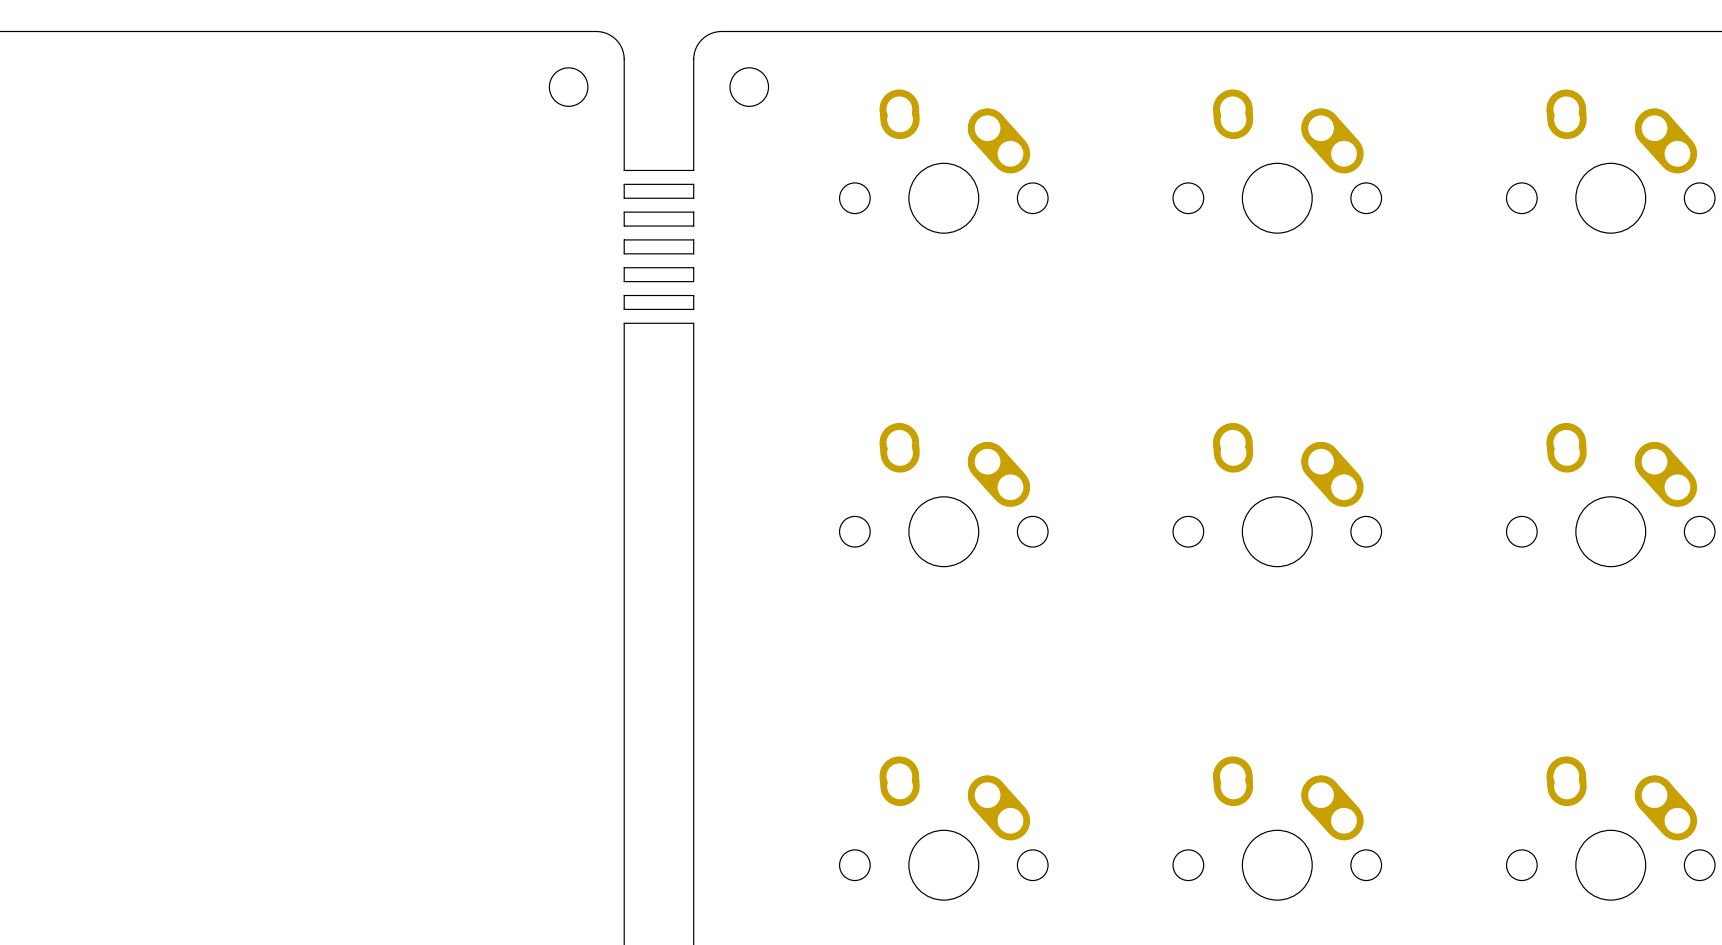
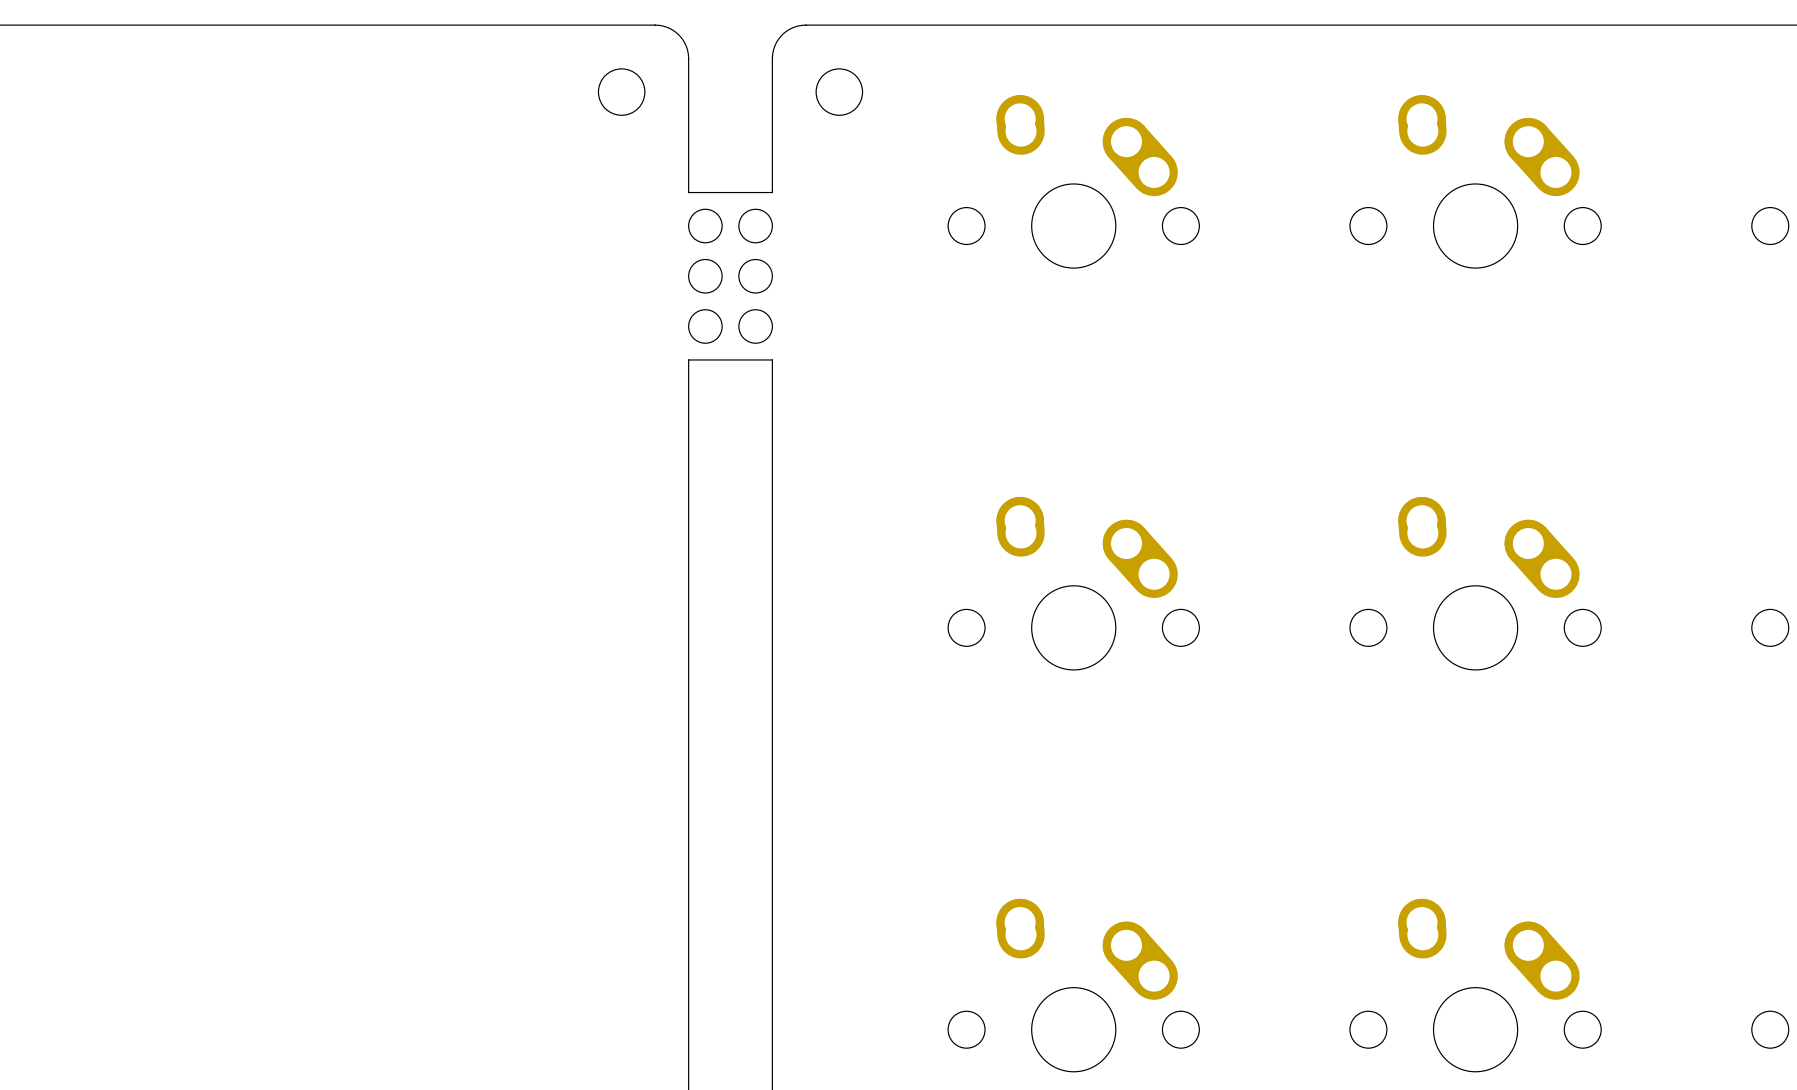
round board edge: none -> [688, 208, 723, 244]
round board edge: none -> [738, 208, 773, 244]
board edge: (693, 184) (693, 198) (624, 198) (624, 184) (693, 184) -> none
board edge: (693, 212) (693, 226) (624, 226) (624, 212) (693, 212) -> none
round board edge: none -> [688, 258, 723, 294]
round board edge: none -> [738, 258, 773, 294]
board edge: (693, 239) (693, 253) (624, 253) (624, 239) (693, 239) -> none
round board edge: none -> [688, 309, 723, 344]
round board edge: none -> [738, 309, 773, 344]
board edge: (693, 267) (693, 281) (624, 281) (624, 267) (693, 267) -> none
board edge: (693, 309) (693, 295) (624, 295) (624, 309) -> (772, 359) (772, 376)
board edge: (693, 323) (624, 323) -> (688, 359) (688, 376)

